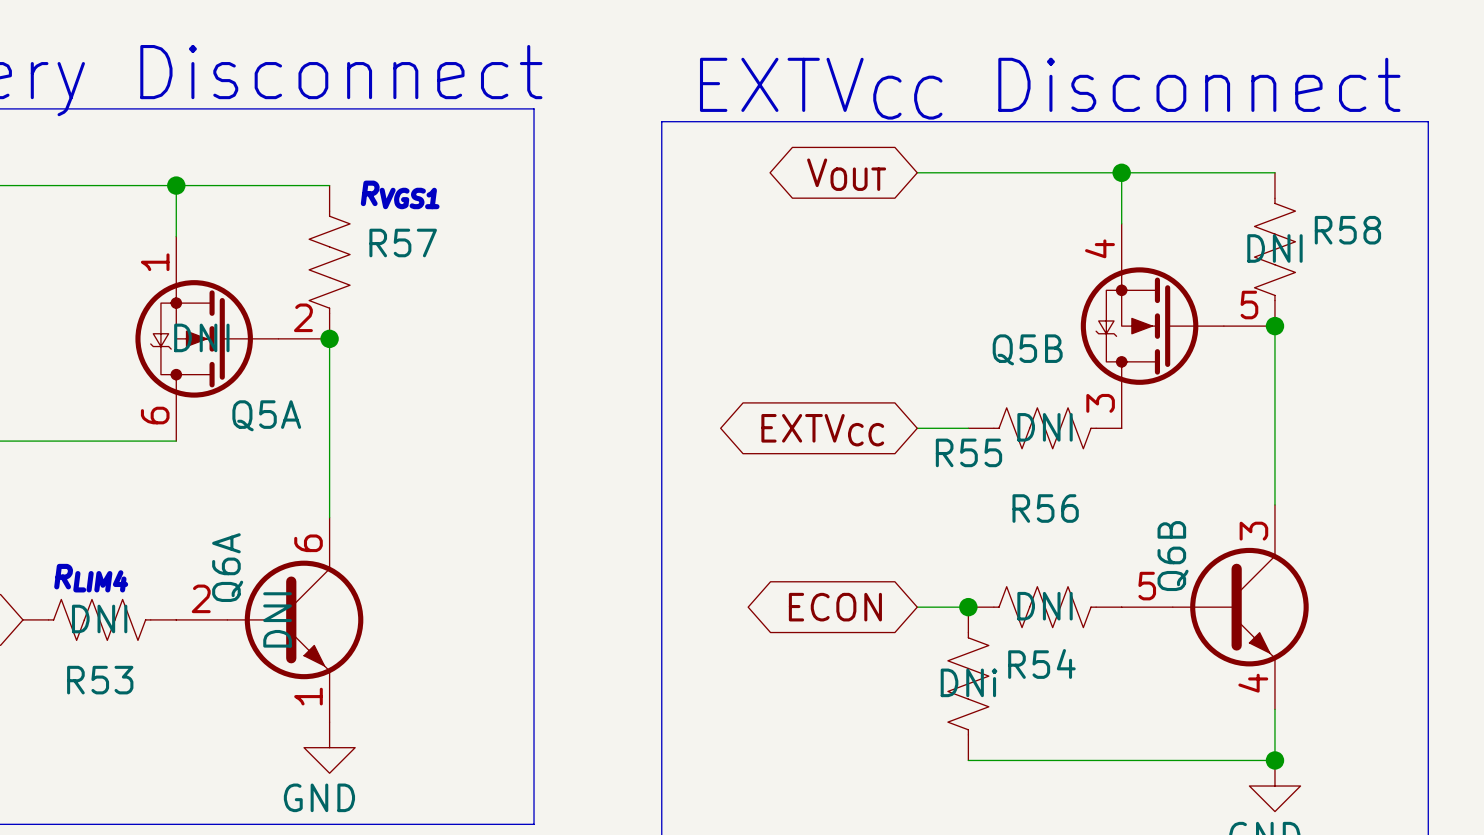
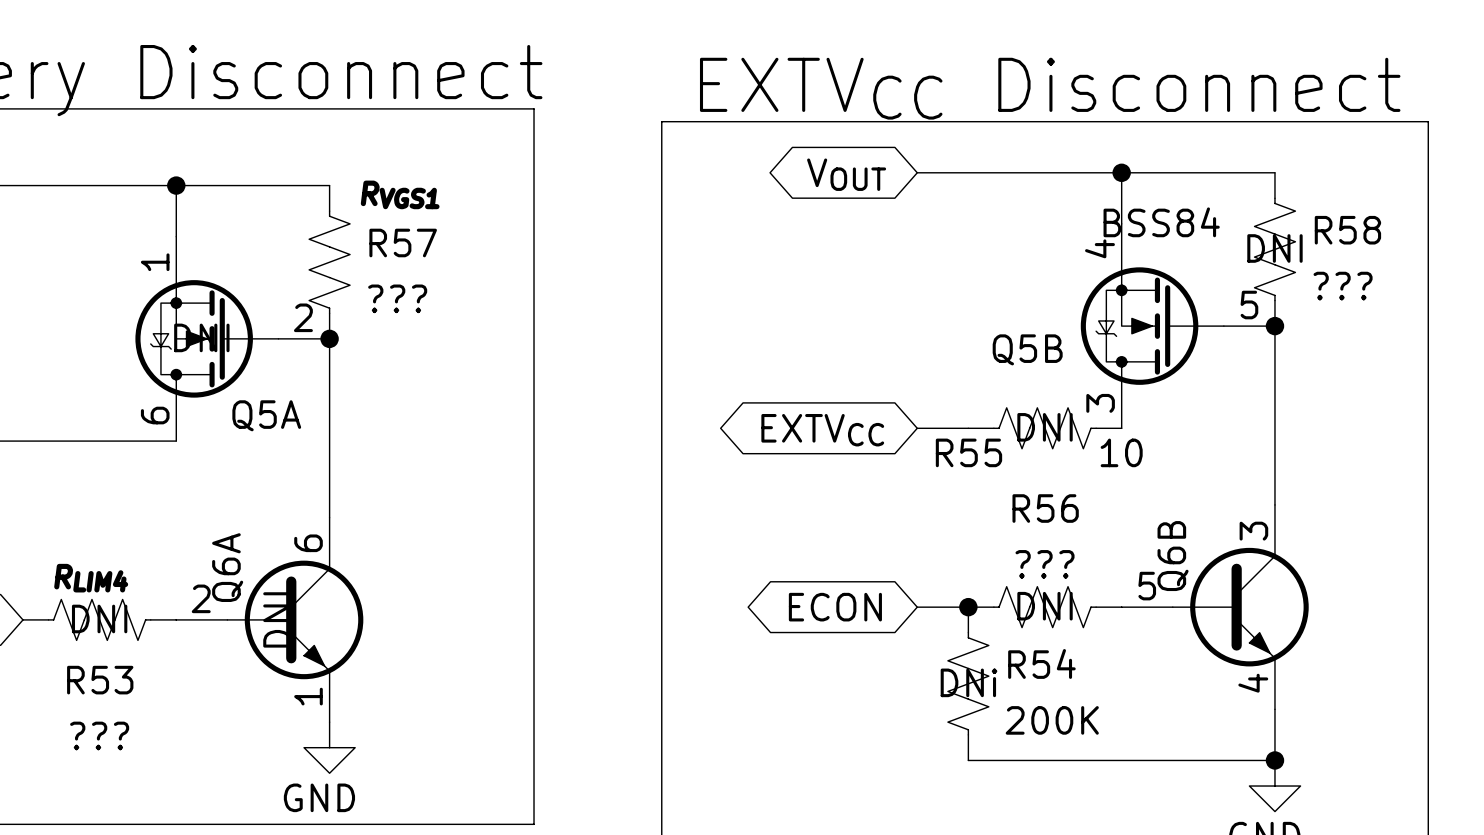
Q5B value: none -> BSS84 (1161, 222)
R58 value: none -> ??? (1343, 286)
R57 value: none -> ??? (397, 298)
R55 value: none -> 10 (1121, 452)
R56 value: none -> ??? (1045, 564)
R54 value: none -> 200K (1052, 720)
R53 value: none -> ??? (99, 735)

